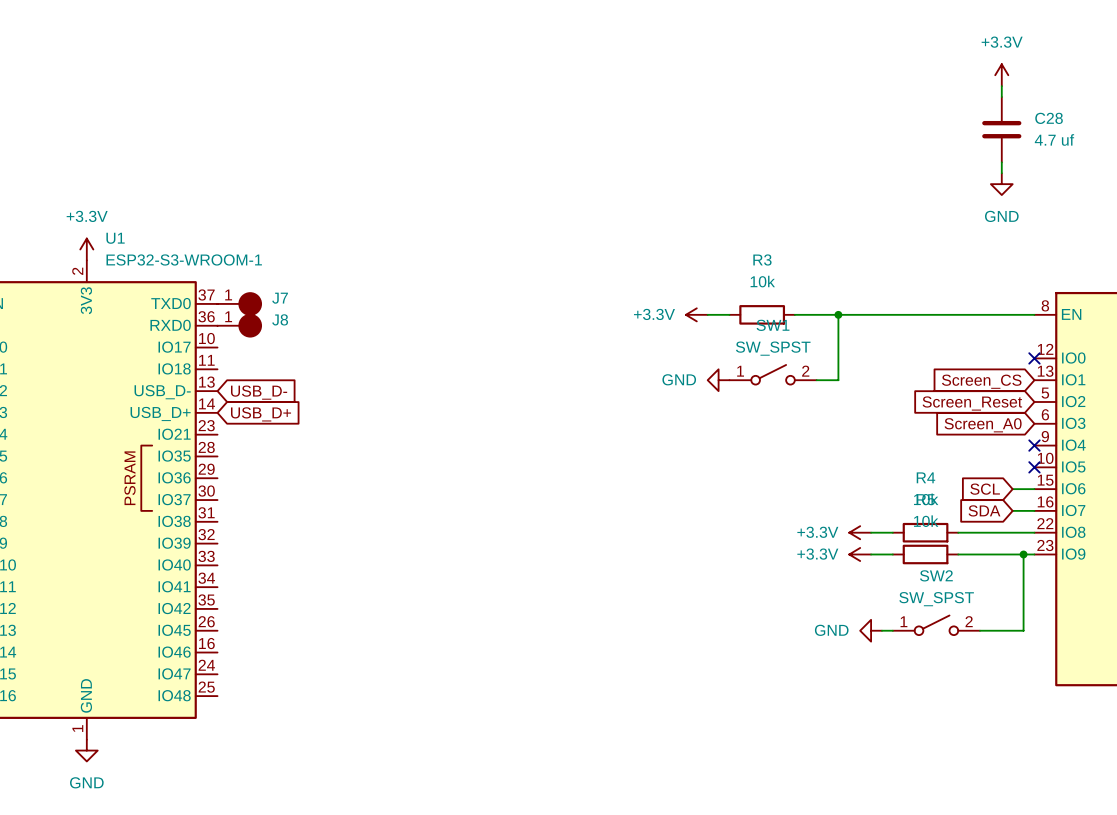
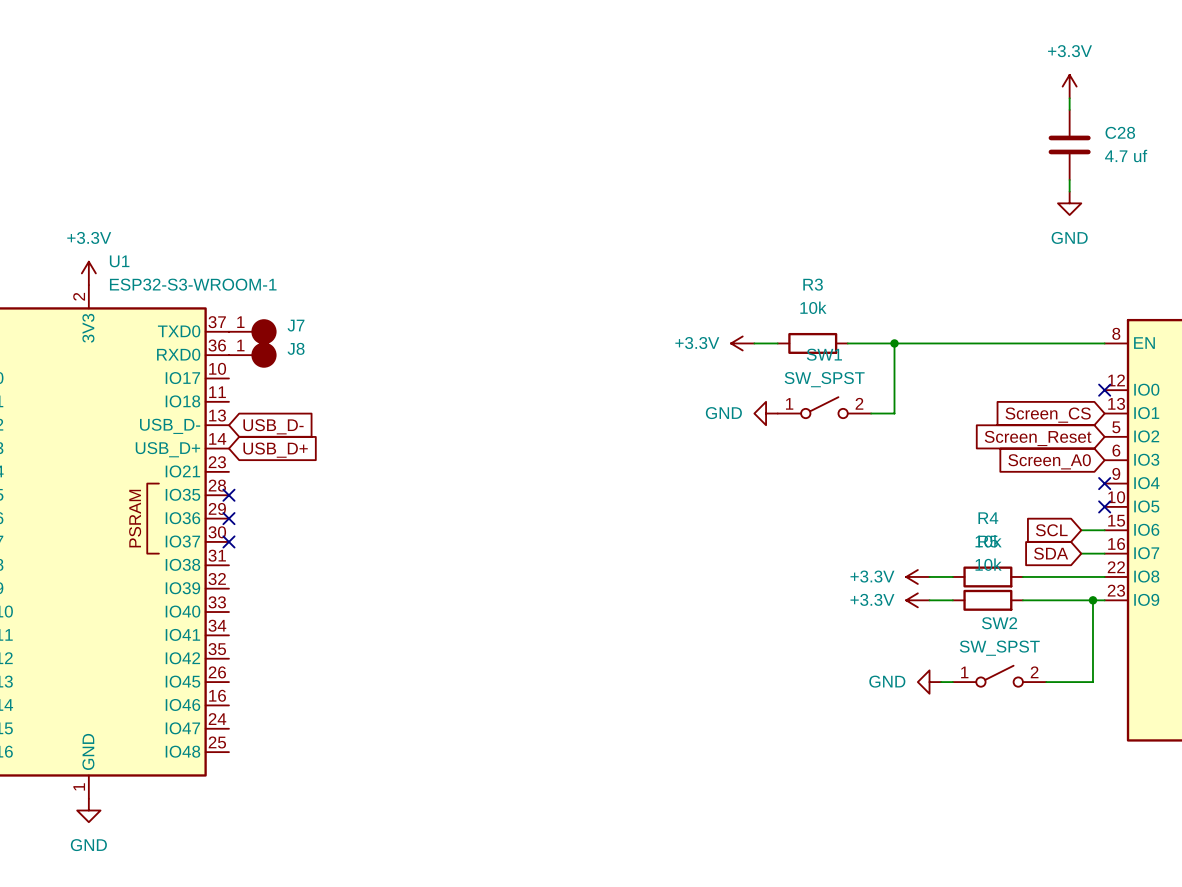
no-connect mark: none -> (228, 495)
no-connect mark: none -> (228, 518)
no-connect mark: none -> (228, 541)

